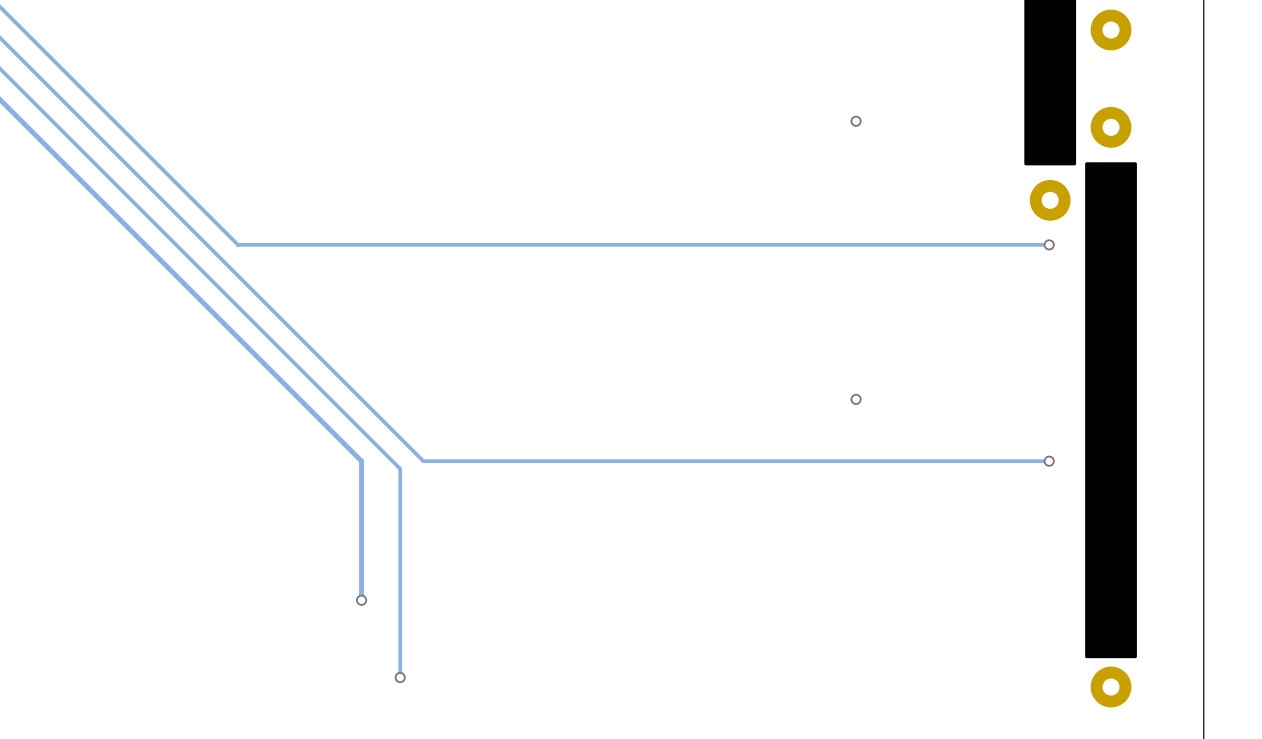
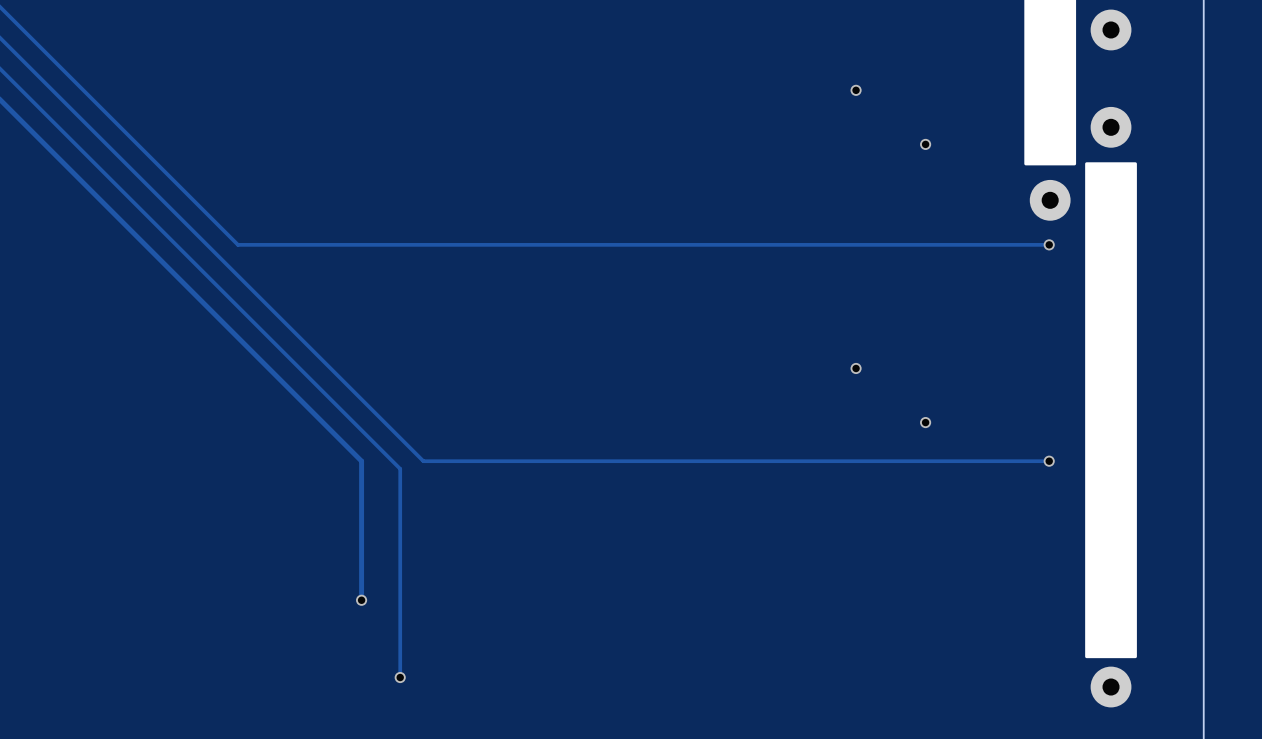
via position: (856, 121) -> (856, 90)
via: none -> (925, 144)
via position: (856, 399) -> (856, 368)
via: none -> (925, 422)

